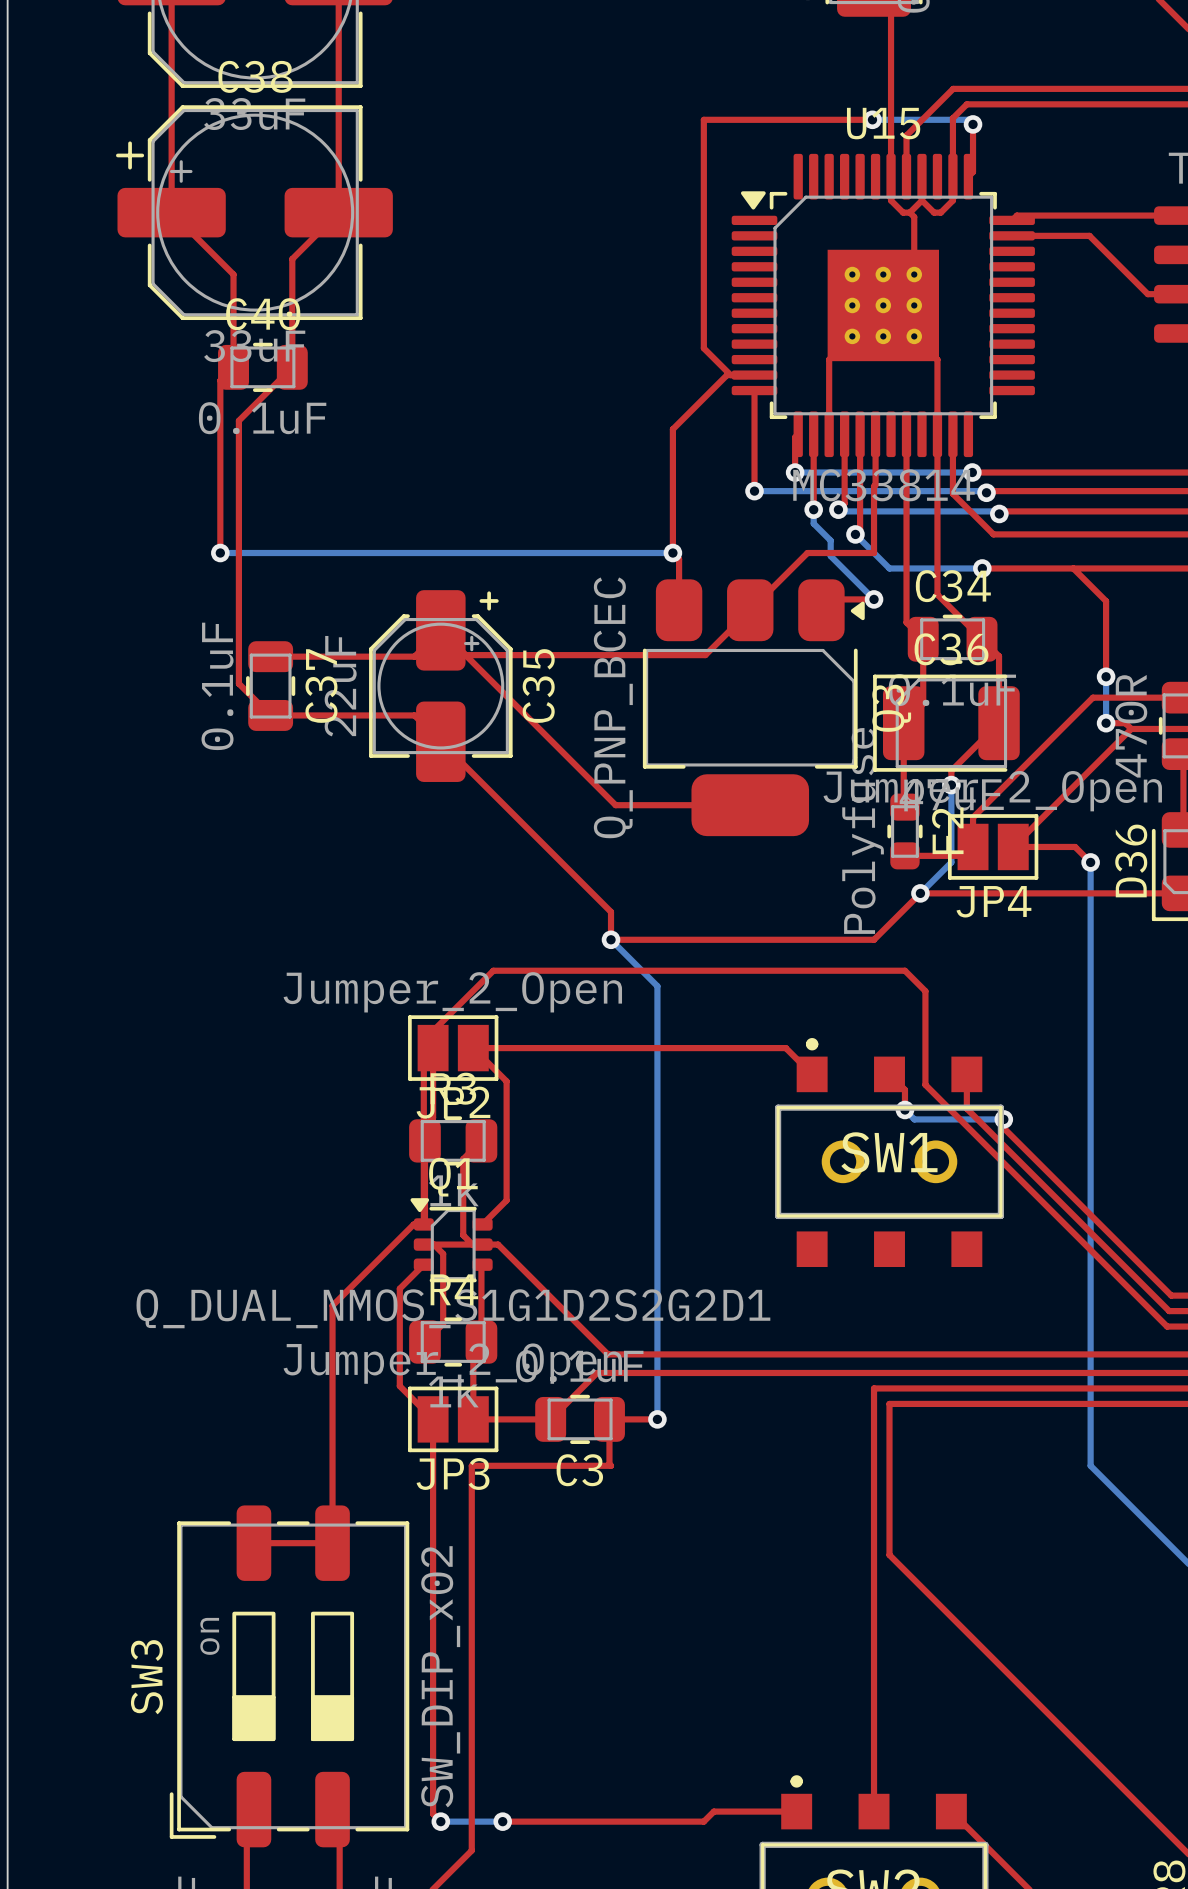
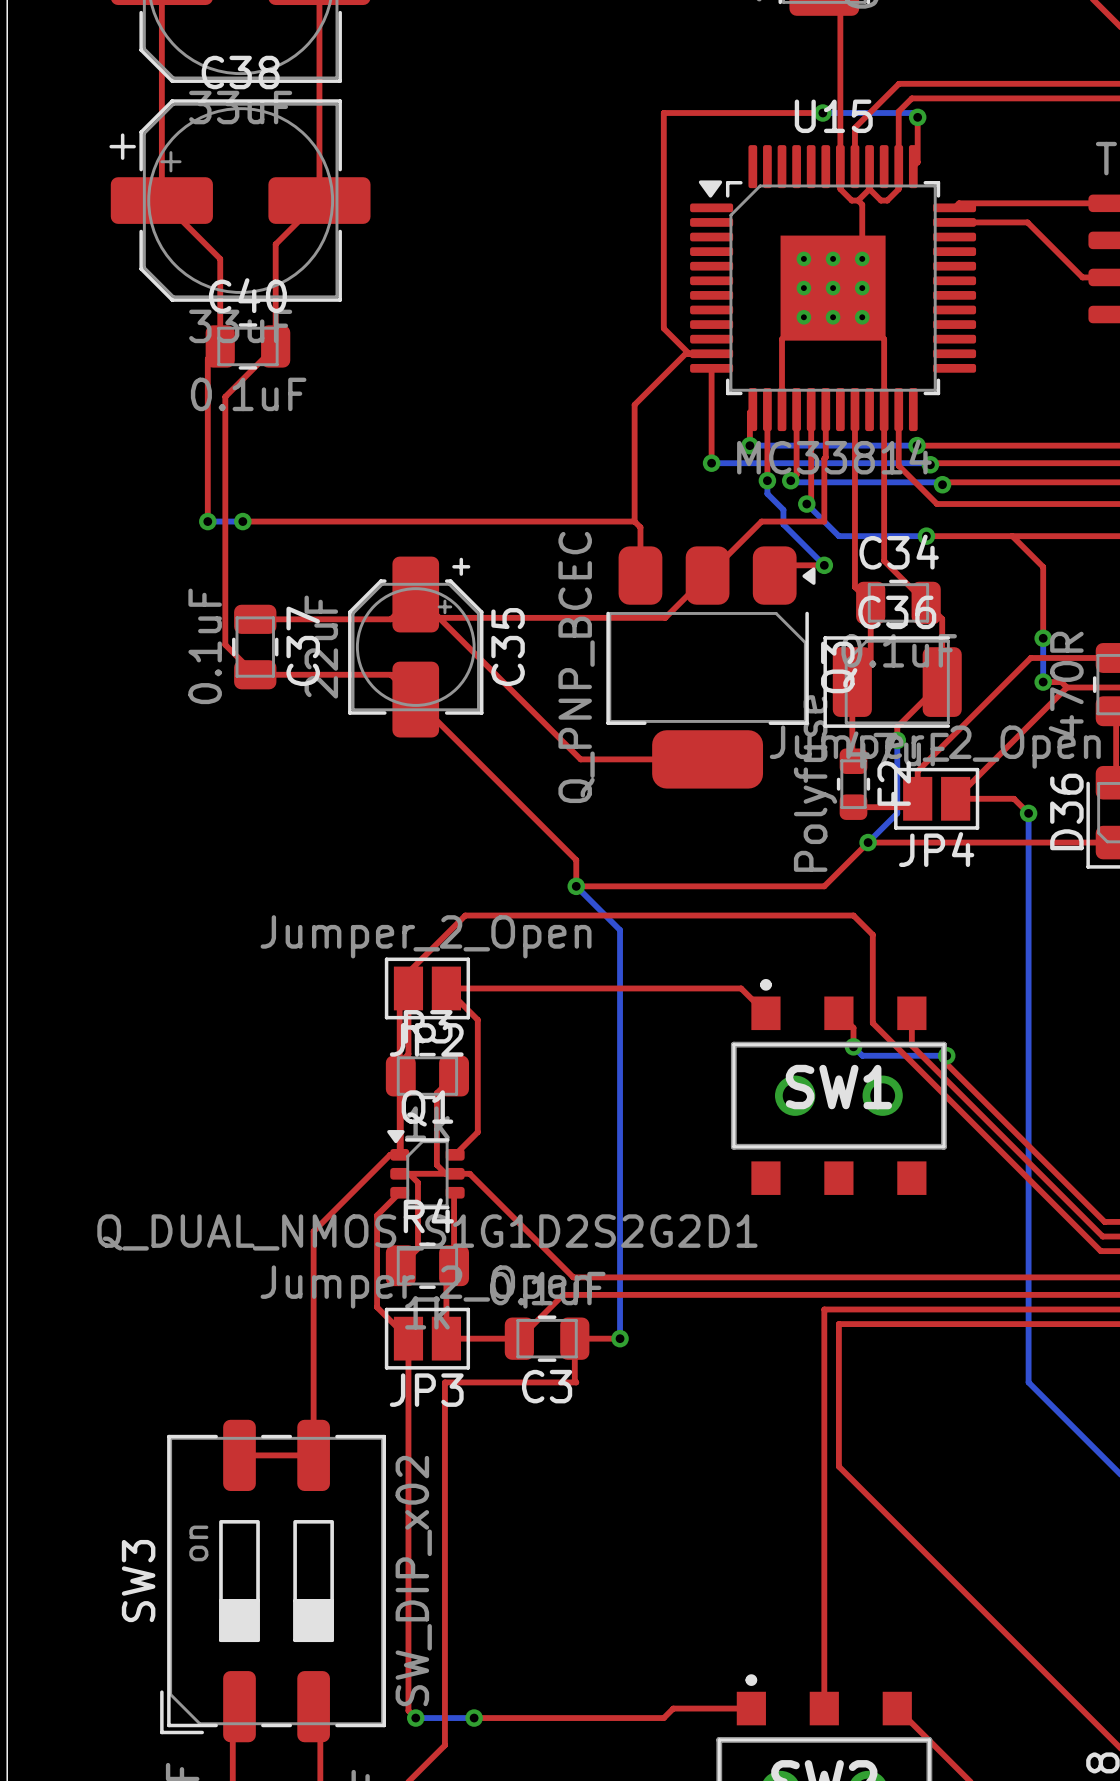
top track: none -> (242, 521) (634, 521)
bottom track: (257, 553) (672, 553) -> none
via: none -> (242, 521)
via: (672, 553) -> none

